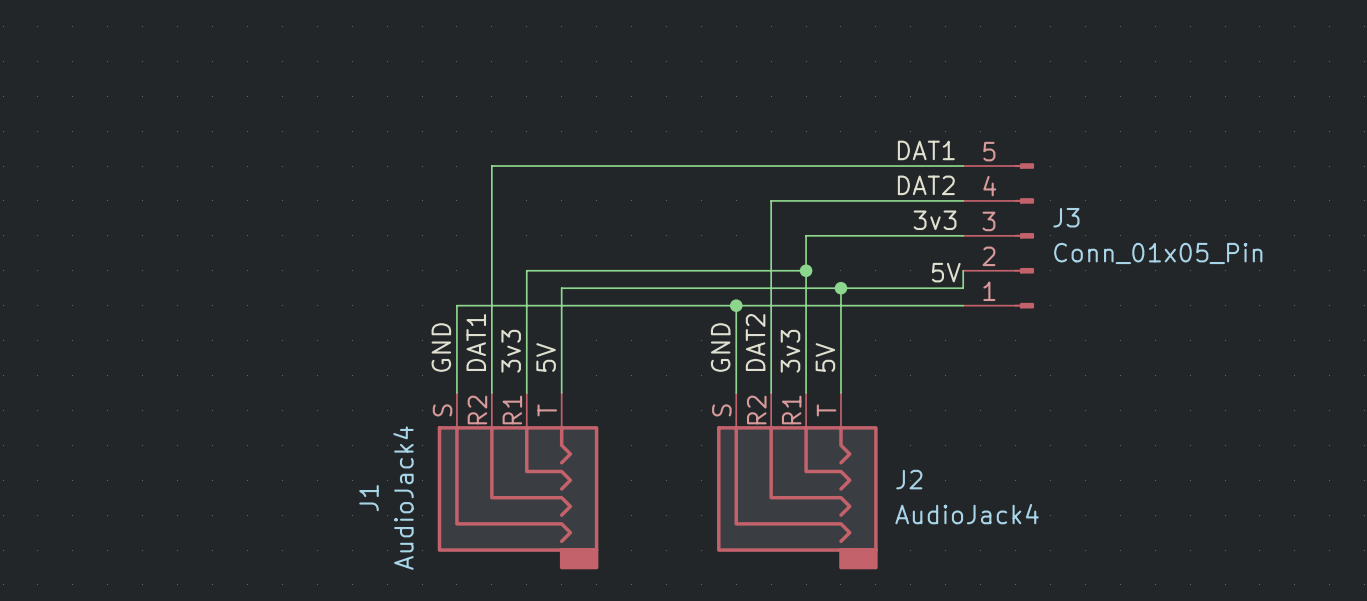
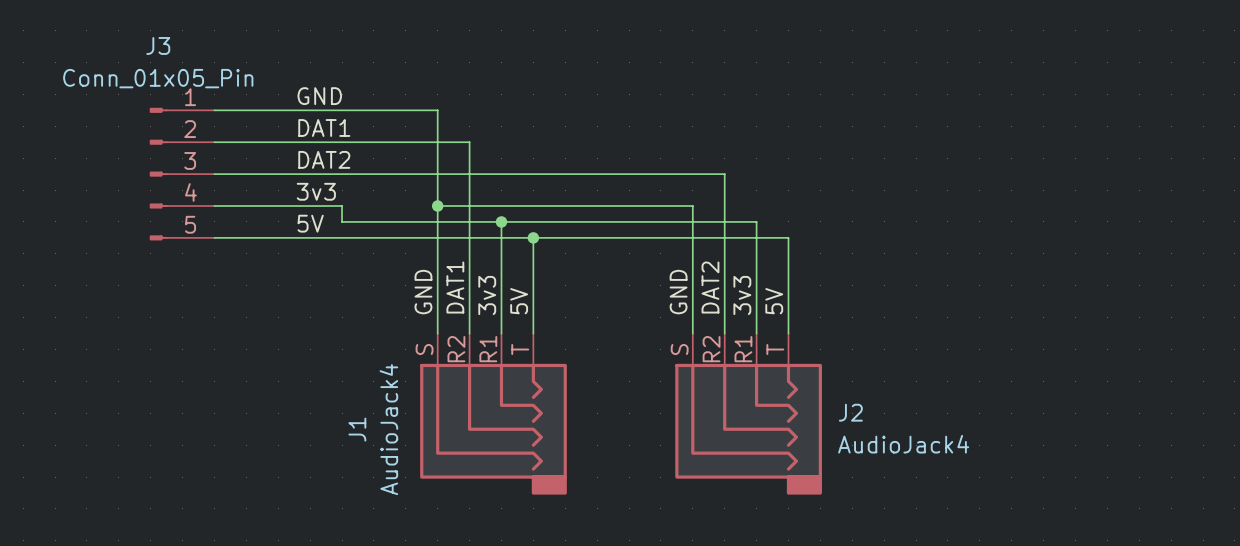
label: none -> GND (319, 96)
label: DAT1 (926, 150) -> none
wire: (963, 166) (491, 166) (491, 183) -> (214, 142) (469, 142)
label: none -> DAT1 (324, 128)
label: DAT2 (926, 185) -> none
wire: (963, 200) (771, 200) (771, 218) -> (214, 174) (724, 174)
label: none -> DAT2 (324, 159)
J3 name position: J3 (1066, 217) -> J3 (158, 45)
label: 3v3 (935, 220) -> none
wire: (963, 235) (806, 235) (806, 270) -> none
J3 position: (998, 235) -> (182, 174)
J3 rotation: 0° (1024, 235) -> 180° (158, 174)
label: none -> 3v3 (316, 191)
wire: none -> (214, 206) (342, 206) (342, 221) (501, 221)
wire: none -> (437, 206) (692, 206) (692, 253)
junction: none -> (437, 206)
J3 value position: Conn_01x05_Pin (1158, 253) -> Conn_01x05_Pin (158, 78)
junction: none -> (501, 221)
junction: (806, 270) -> none
wire: (963, 270) (963, 288) (840, 288) -> none
label: none -> 5V (310, 223)
label: 5V (946, 272) -> none
wire: none -> (214, 237) (533, 237)
junction: none -> (533, 237)
junction: (840, 288) -> none
wire: (456, 305) (963, 305) -> (437, 253) (437, 110) (214, 110)
junction: (736, 305) -> none

